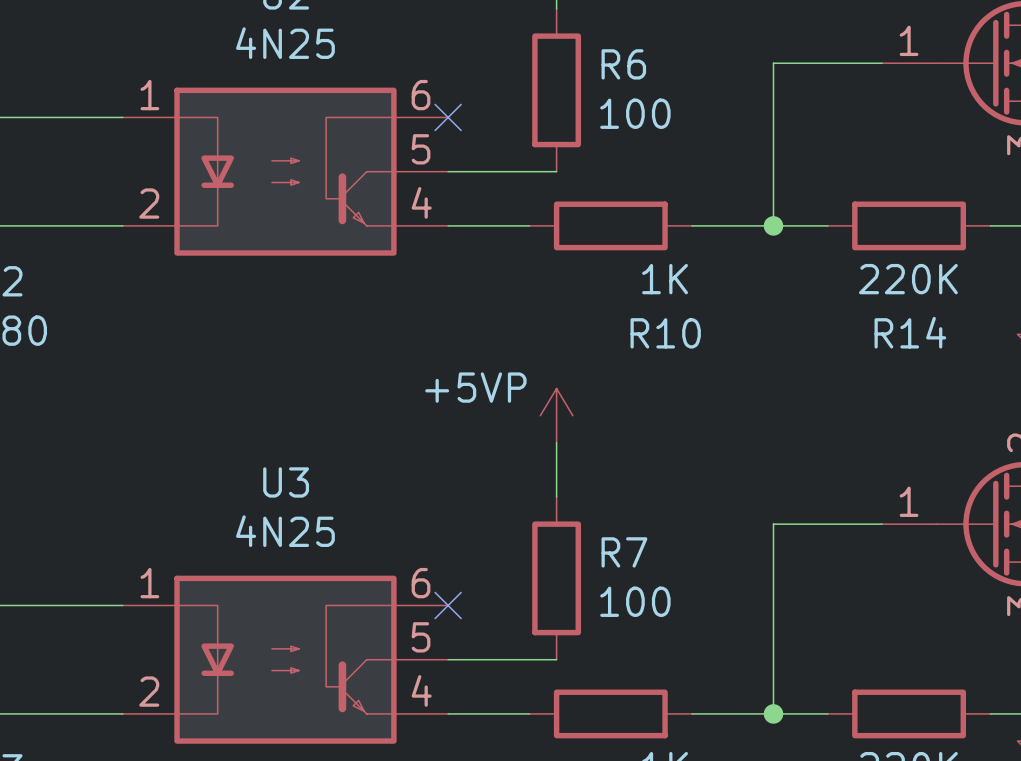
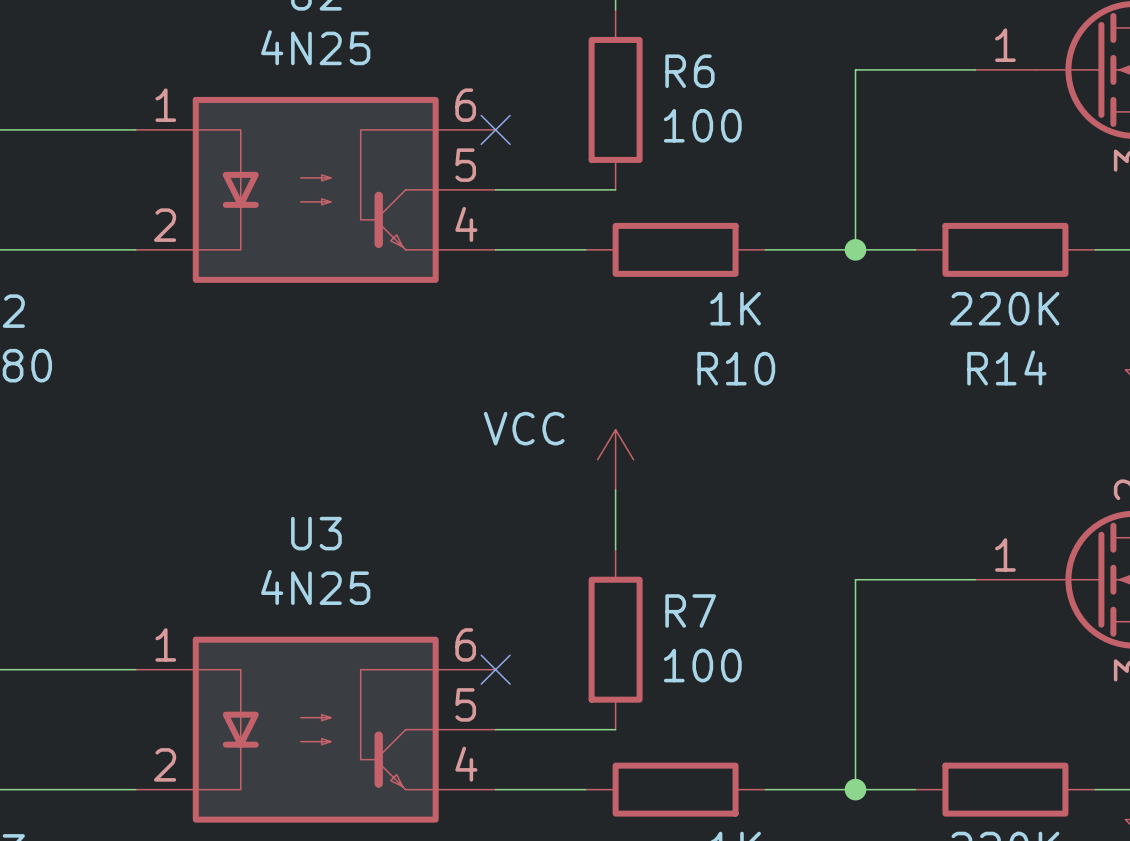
power symbol: +5VP (556, 415) -> VCC (615, 459)

